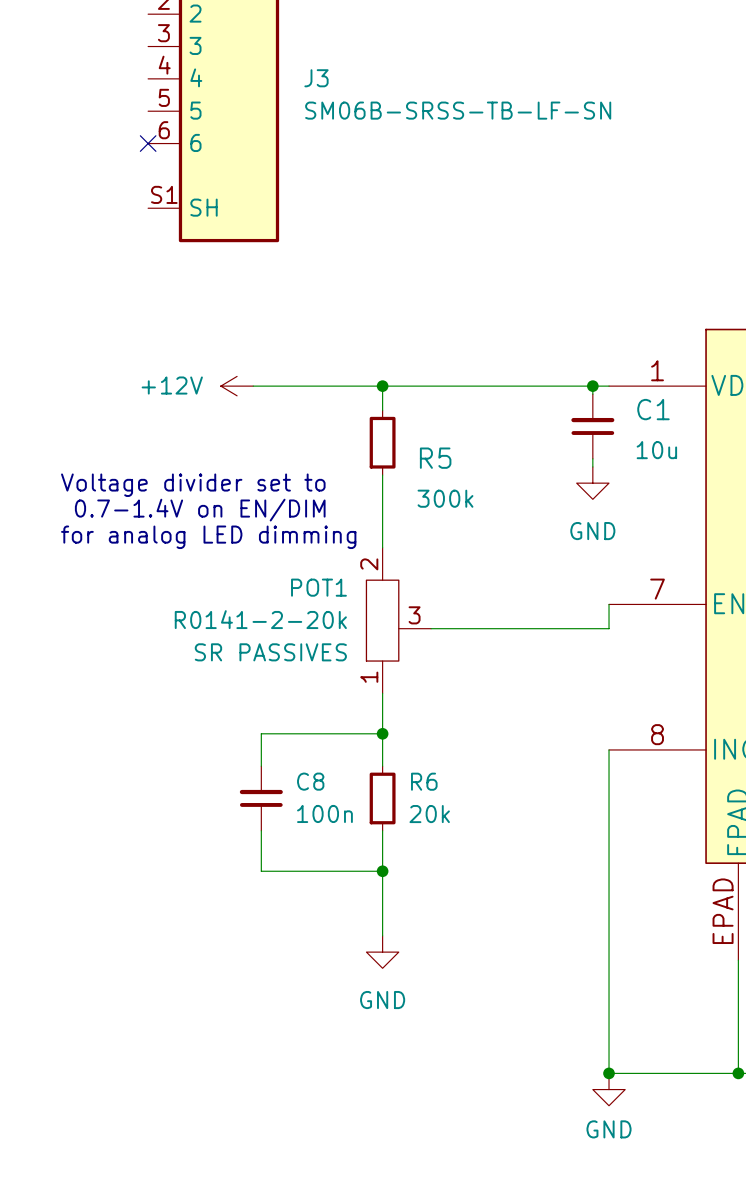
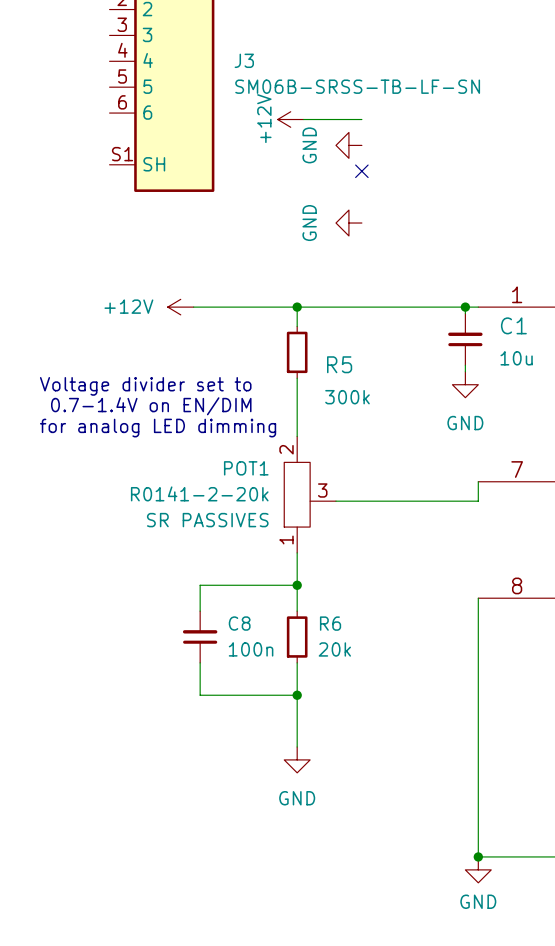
no-connect mark: (148, 143) -> none
power symbol: none -> +12V (290, 119)
wire: none -> (303, 119) (361, 119)
power symbol: none -> GND (348, 145)
no-connect mark: none -> (361, 171)
power symbol: none -> GND (348, 223)

